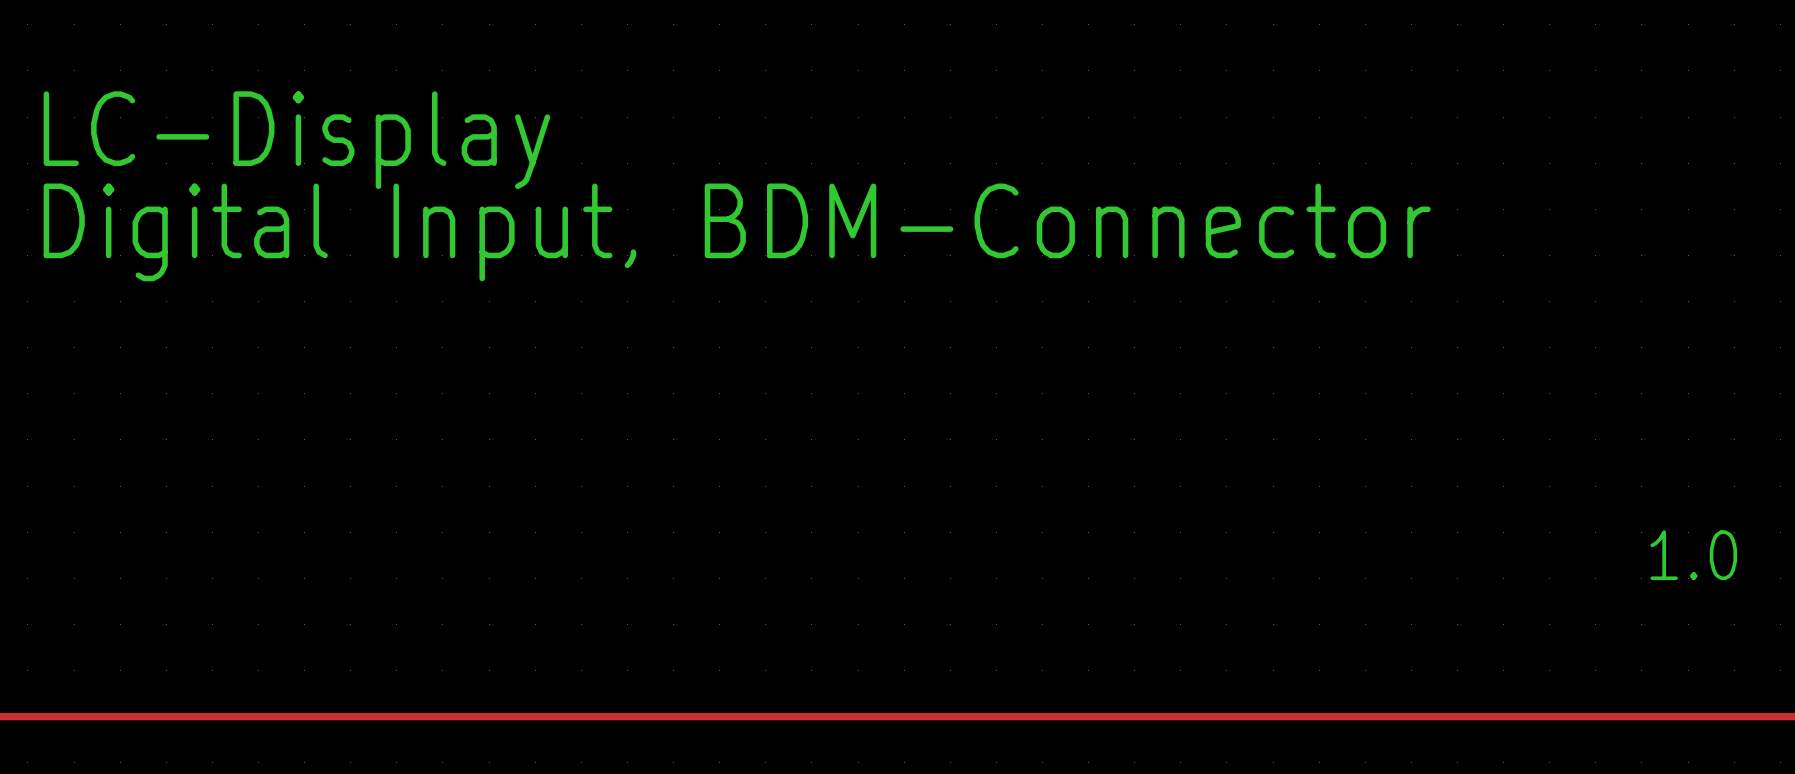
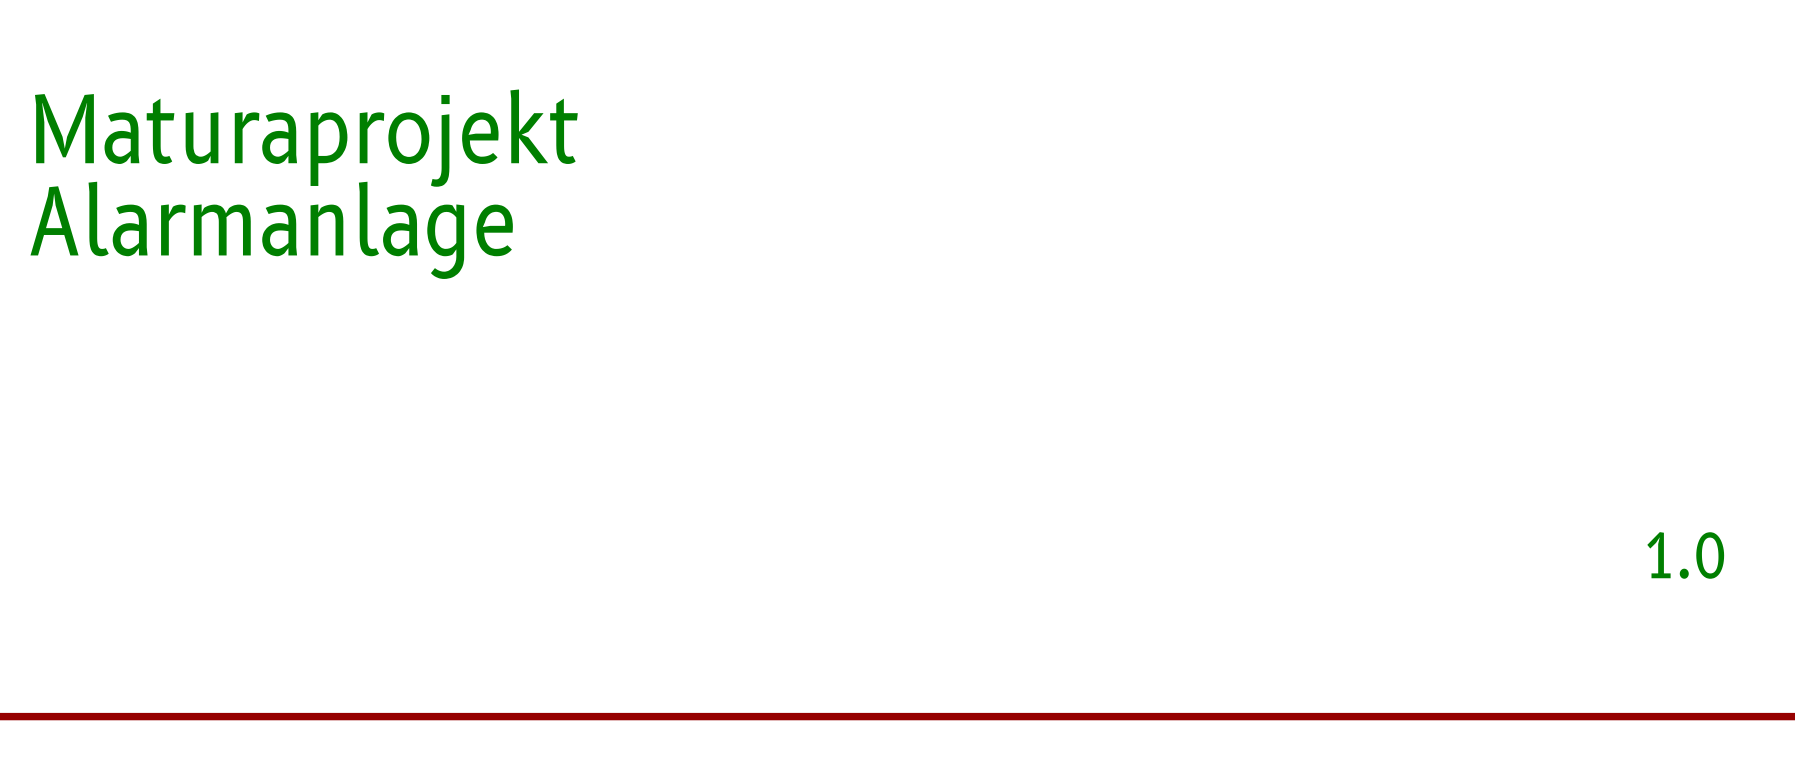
text: LC-Display (296, 140) -> Maturaprojekt (306, 138)
text: Digital Input, BDM-Connector (737, 232) -> Alarmanlage (271, 230)

